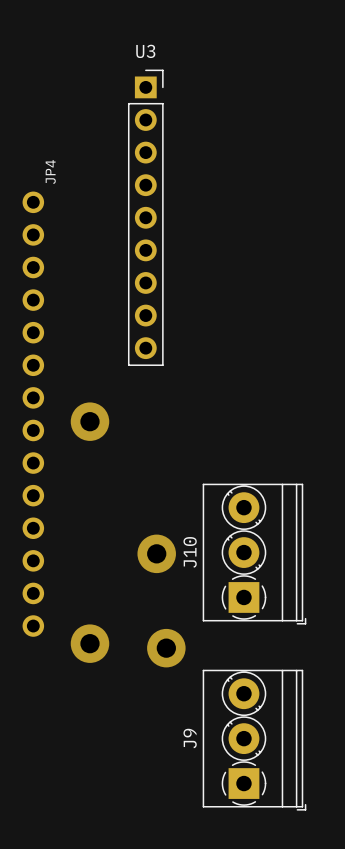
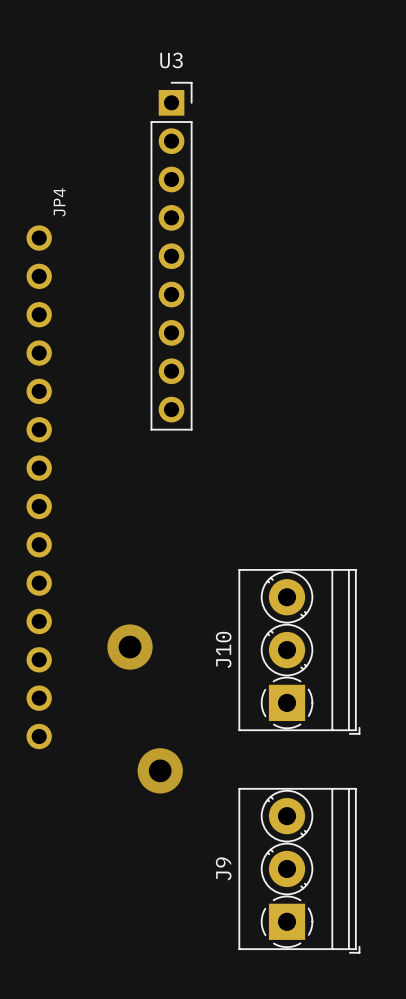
via: (89, 421) -> none
via position: (156, 553) -> (130, 647)
via: (89, 643) -> none
via: (166, 648) -> none
via: none -> (160, 770)

